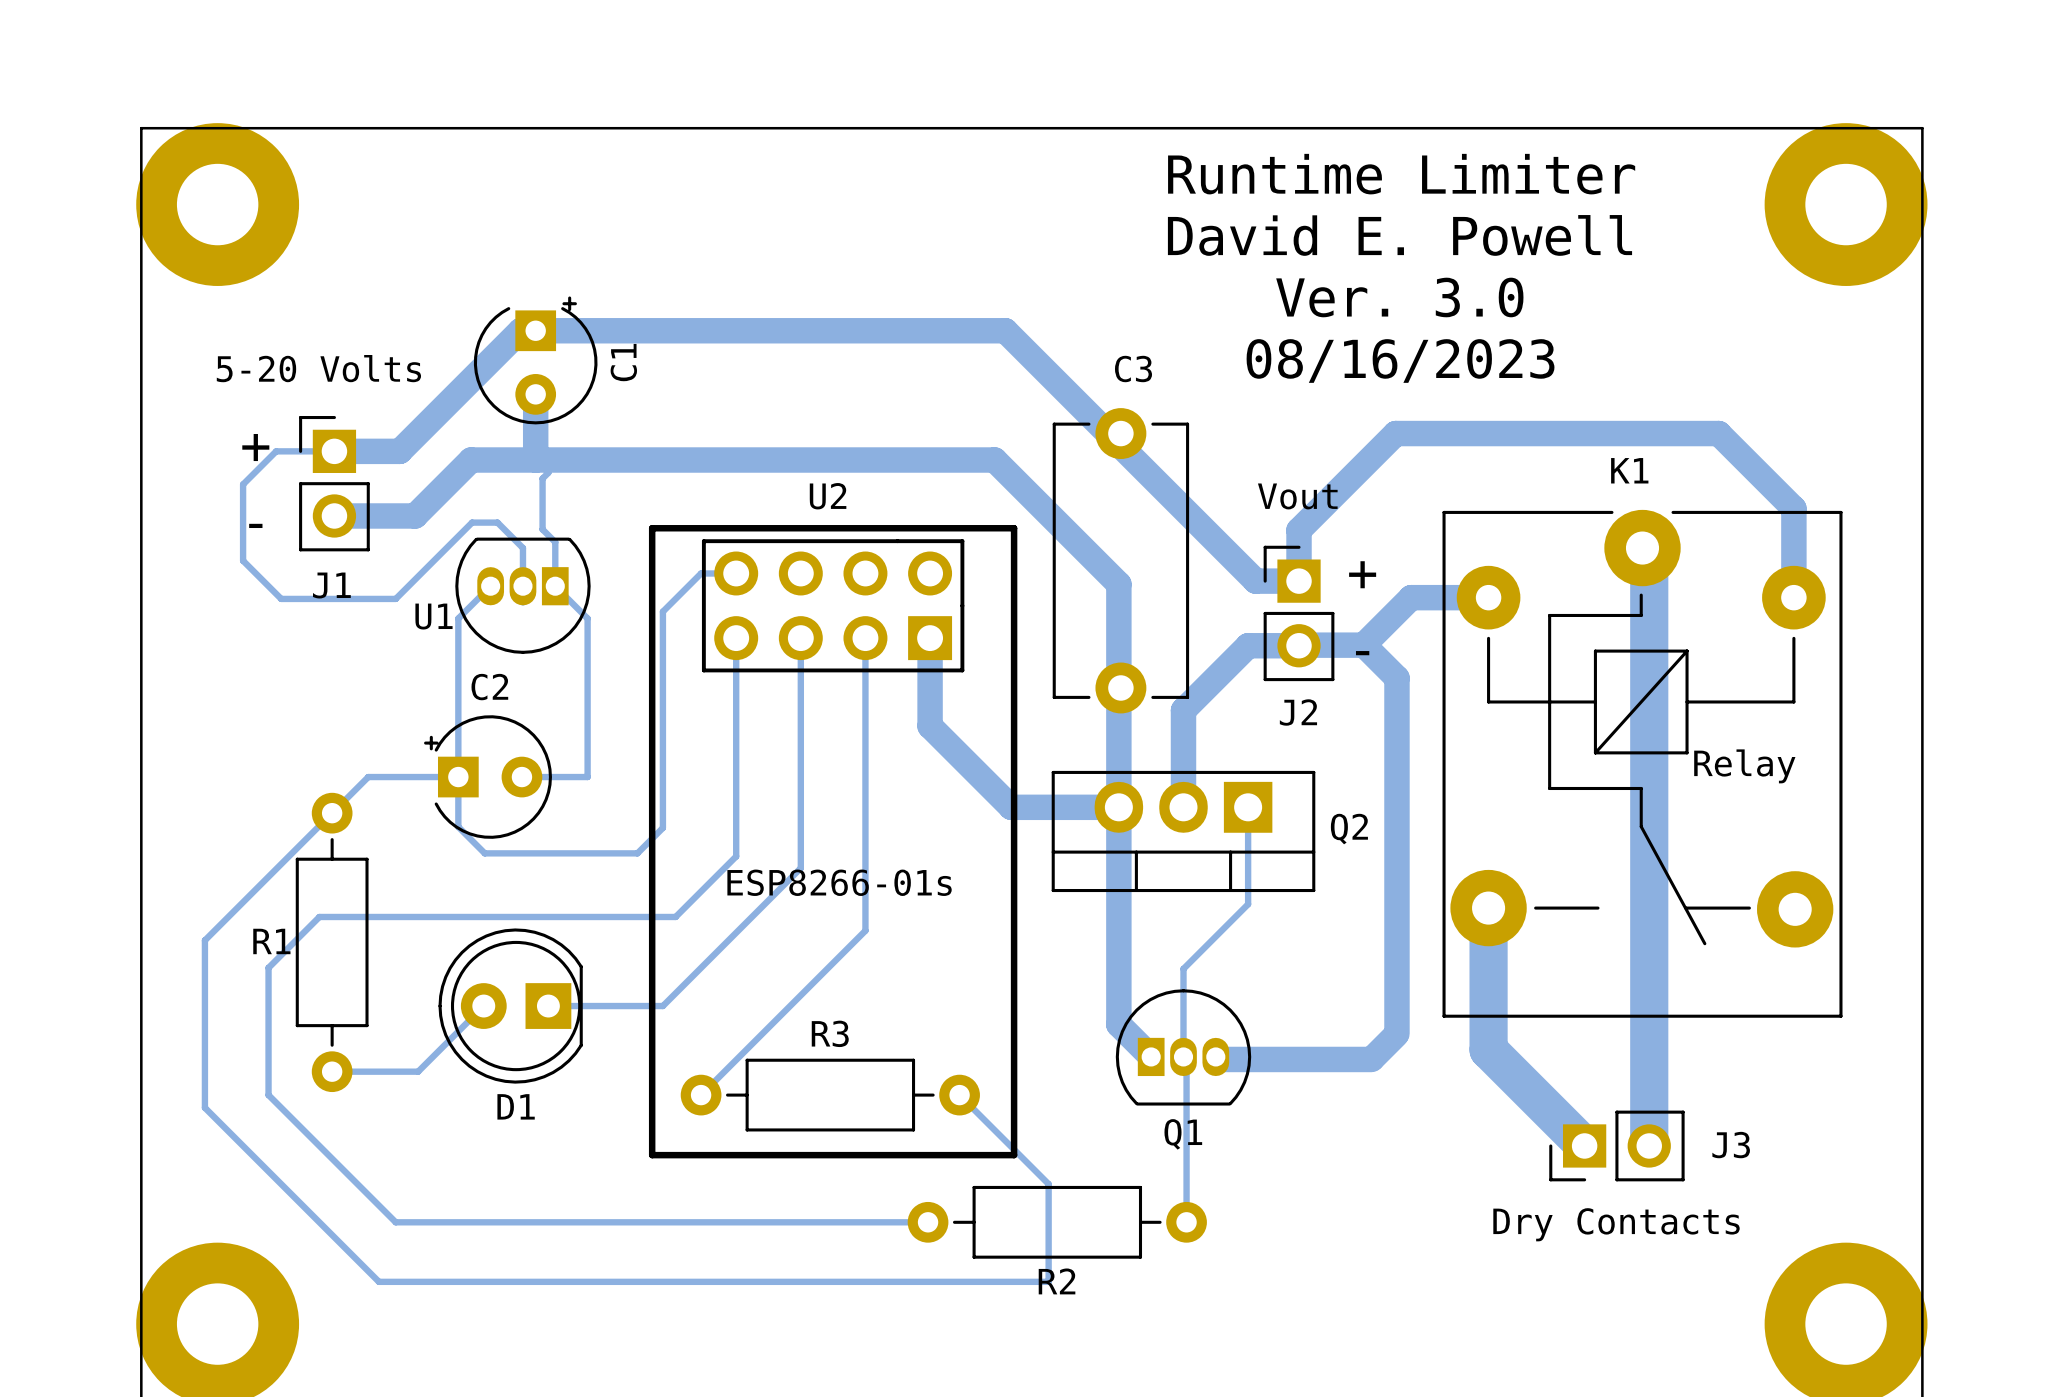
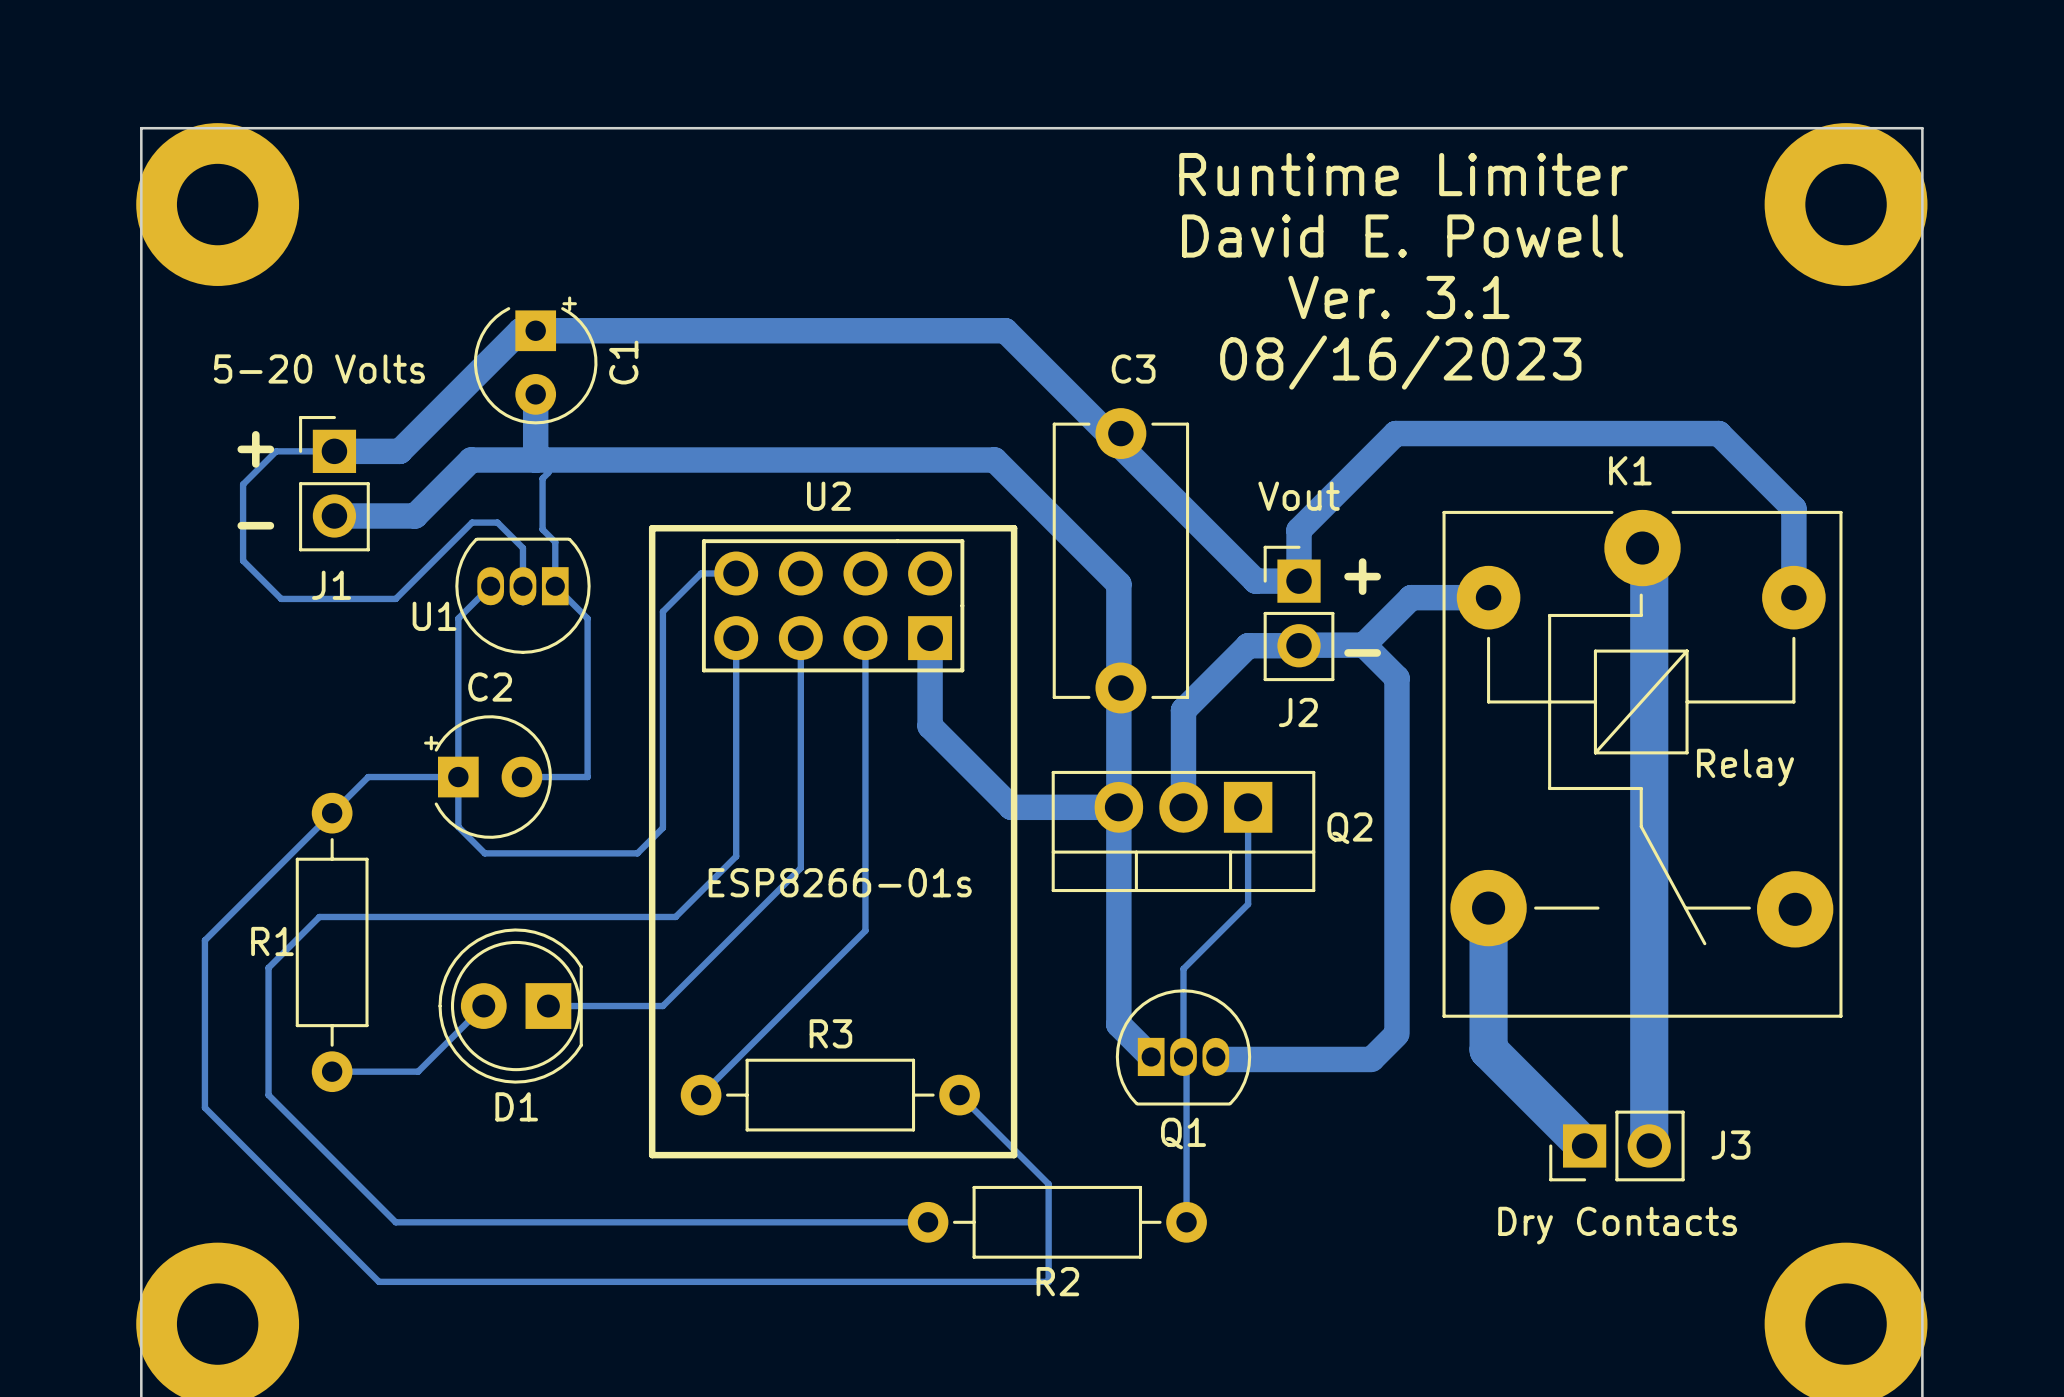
text: Ver. 3.0 (1399, 297) -> Ver. 3.1 (1398, 297)

